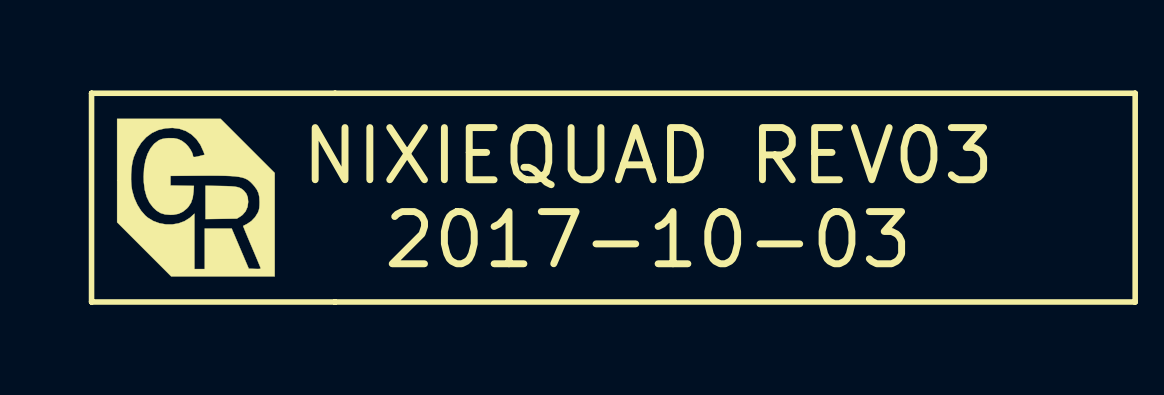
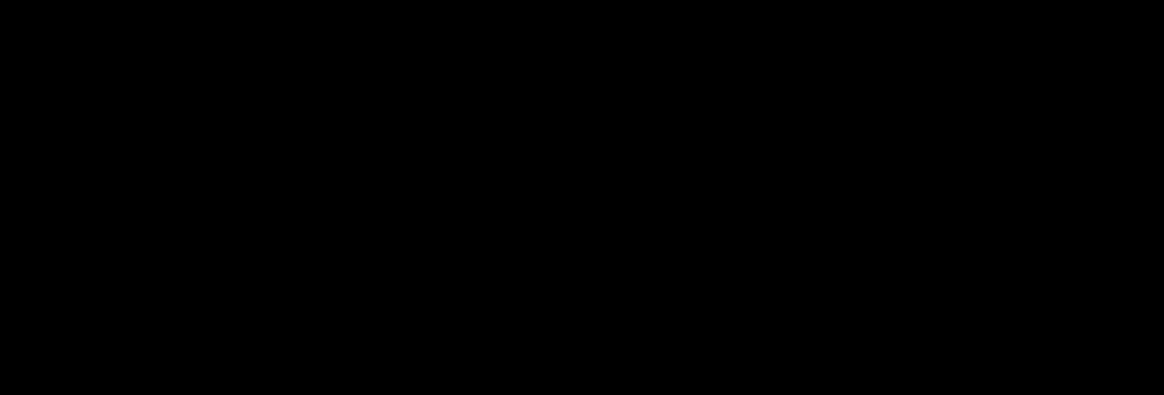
line: (91, 93) (1135, 93) (1135, 301) (91, 301) (91, 93) -> none
drawing: [116, 118, 275, 277] -> none
text: NIXIEQUAD REV03 (649, 156) -> none
text: 2017-10-03 (646, 237) -> none

